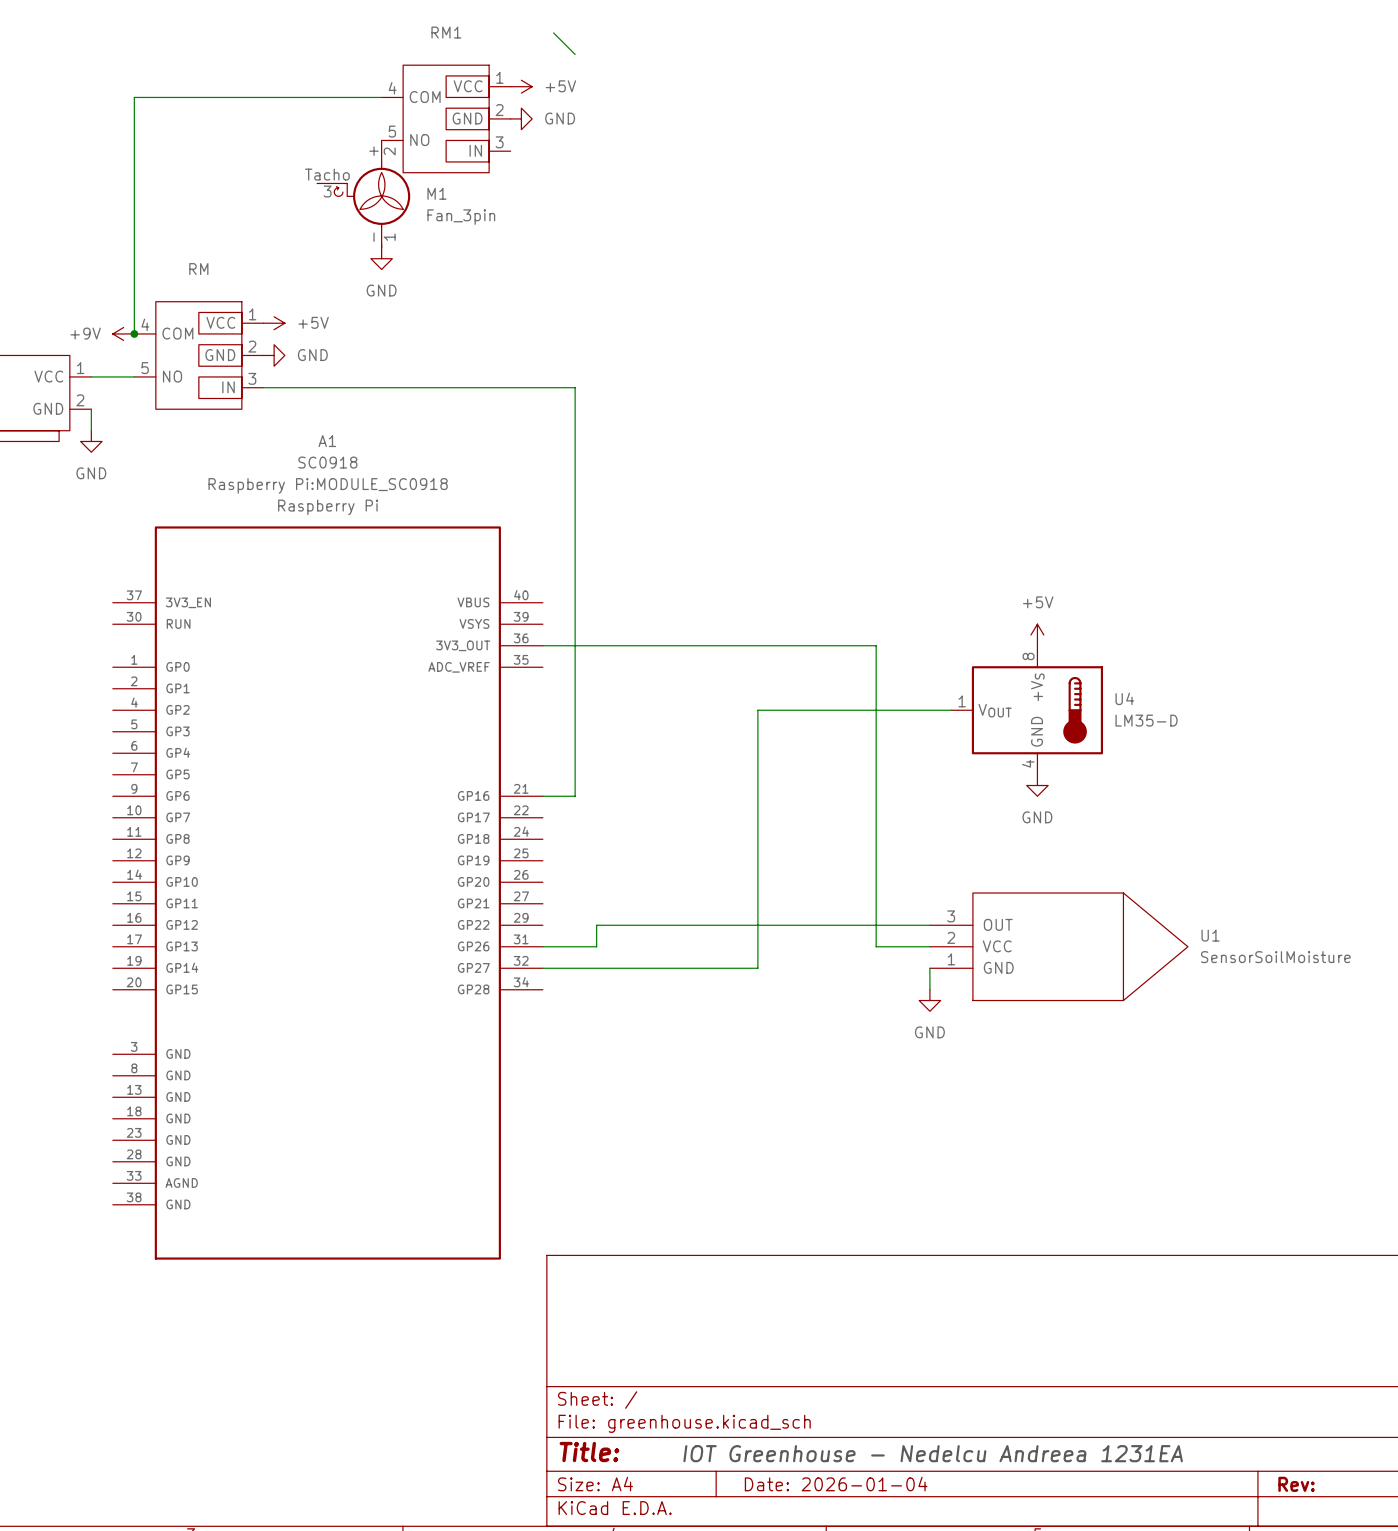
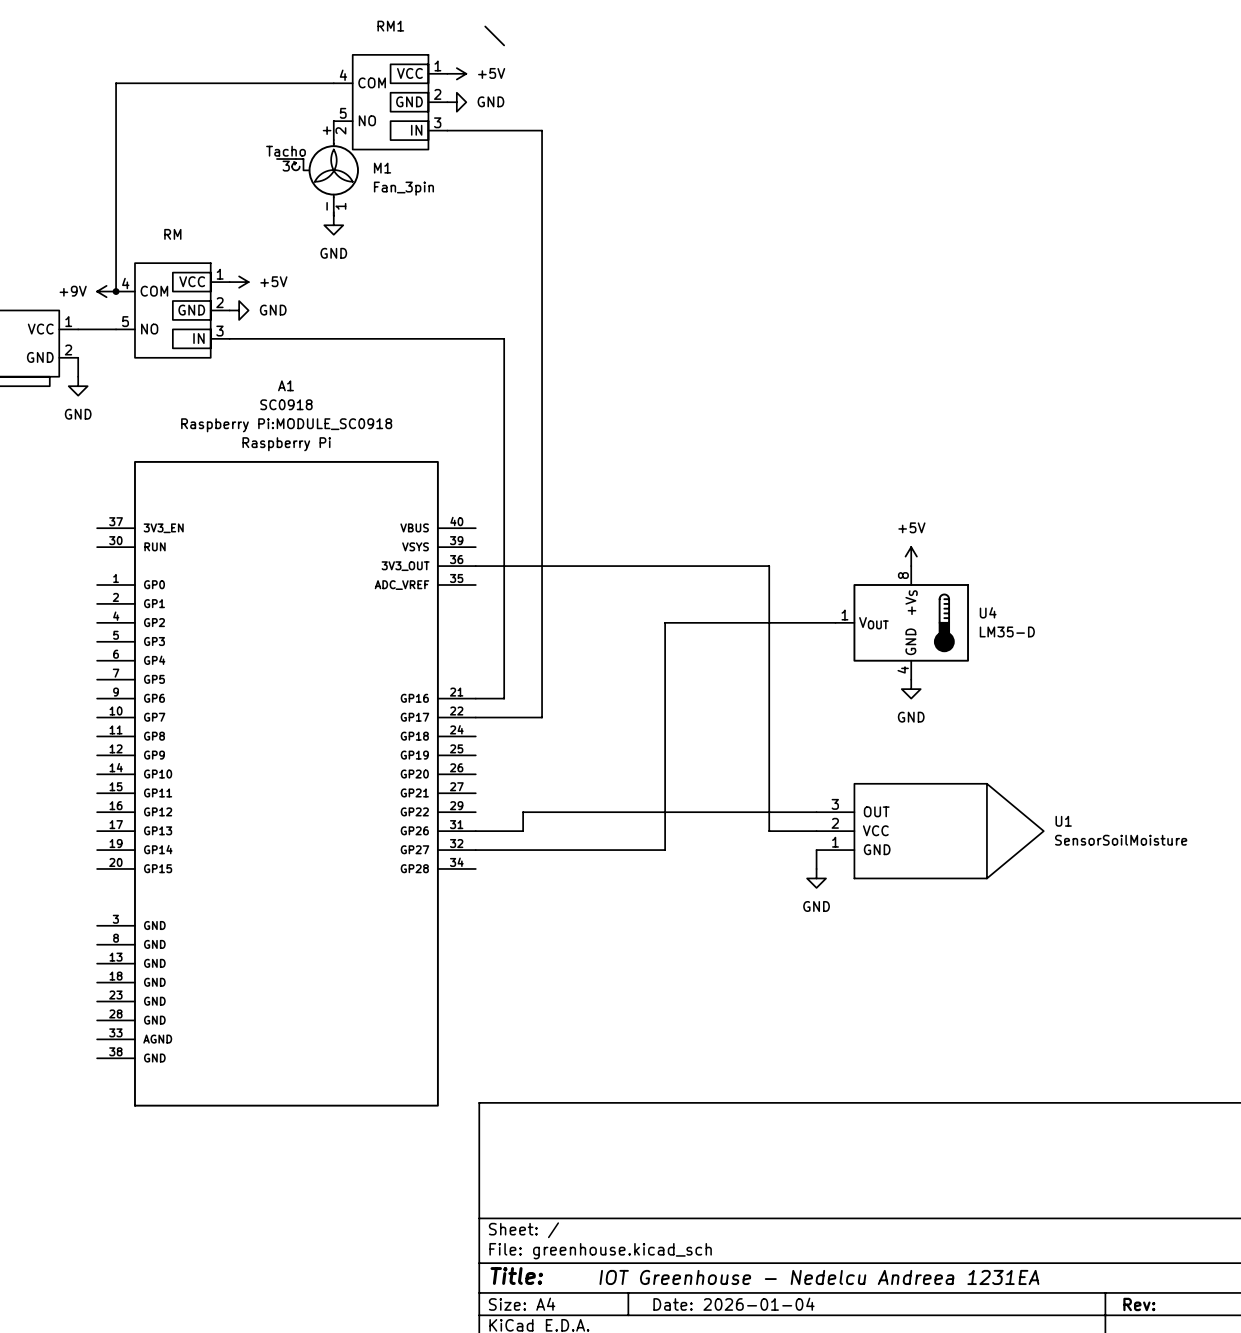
wire: none -> (447, 130) (542, 130) (542, 717) (475, 717)

